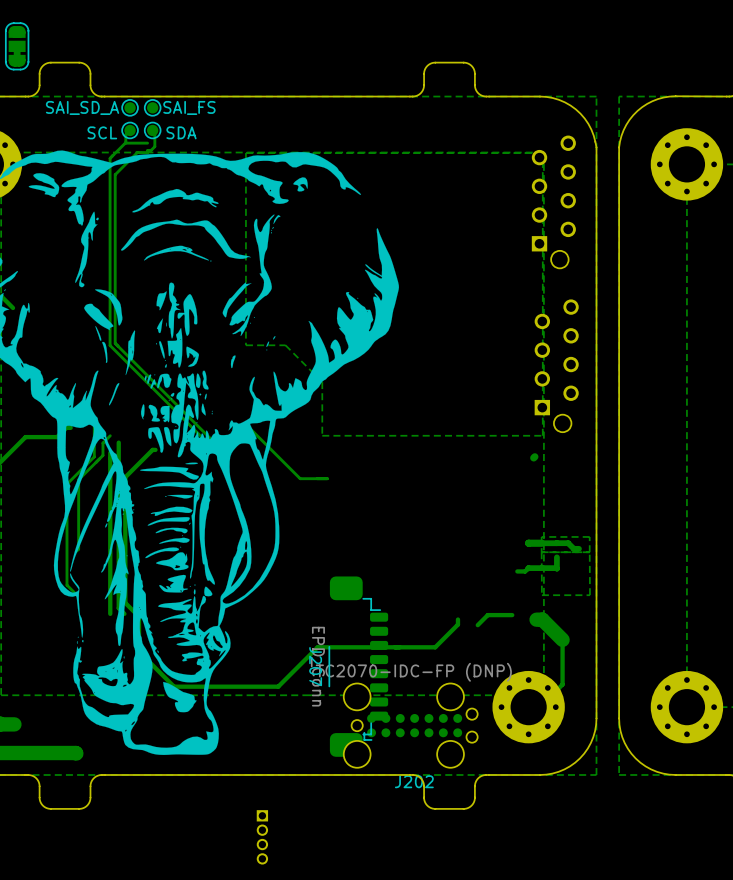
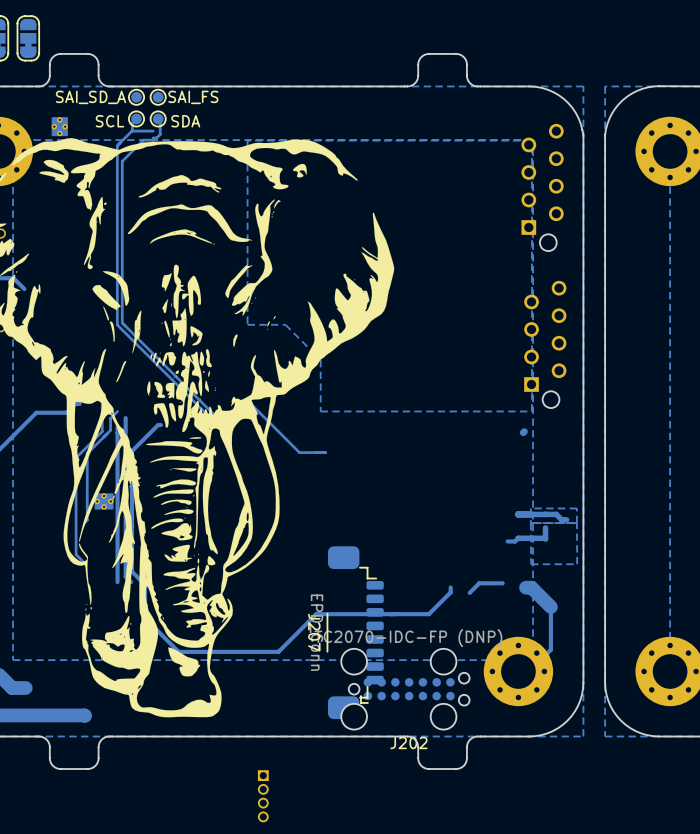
part: none -> (59, 126)
part: none -> (104, 501)

